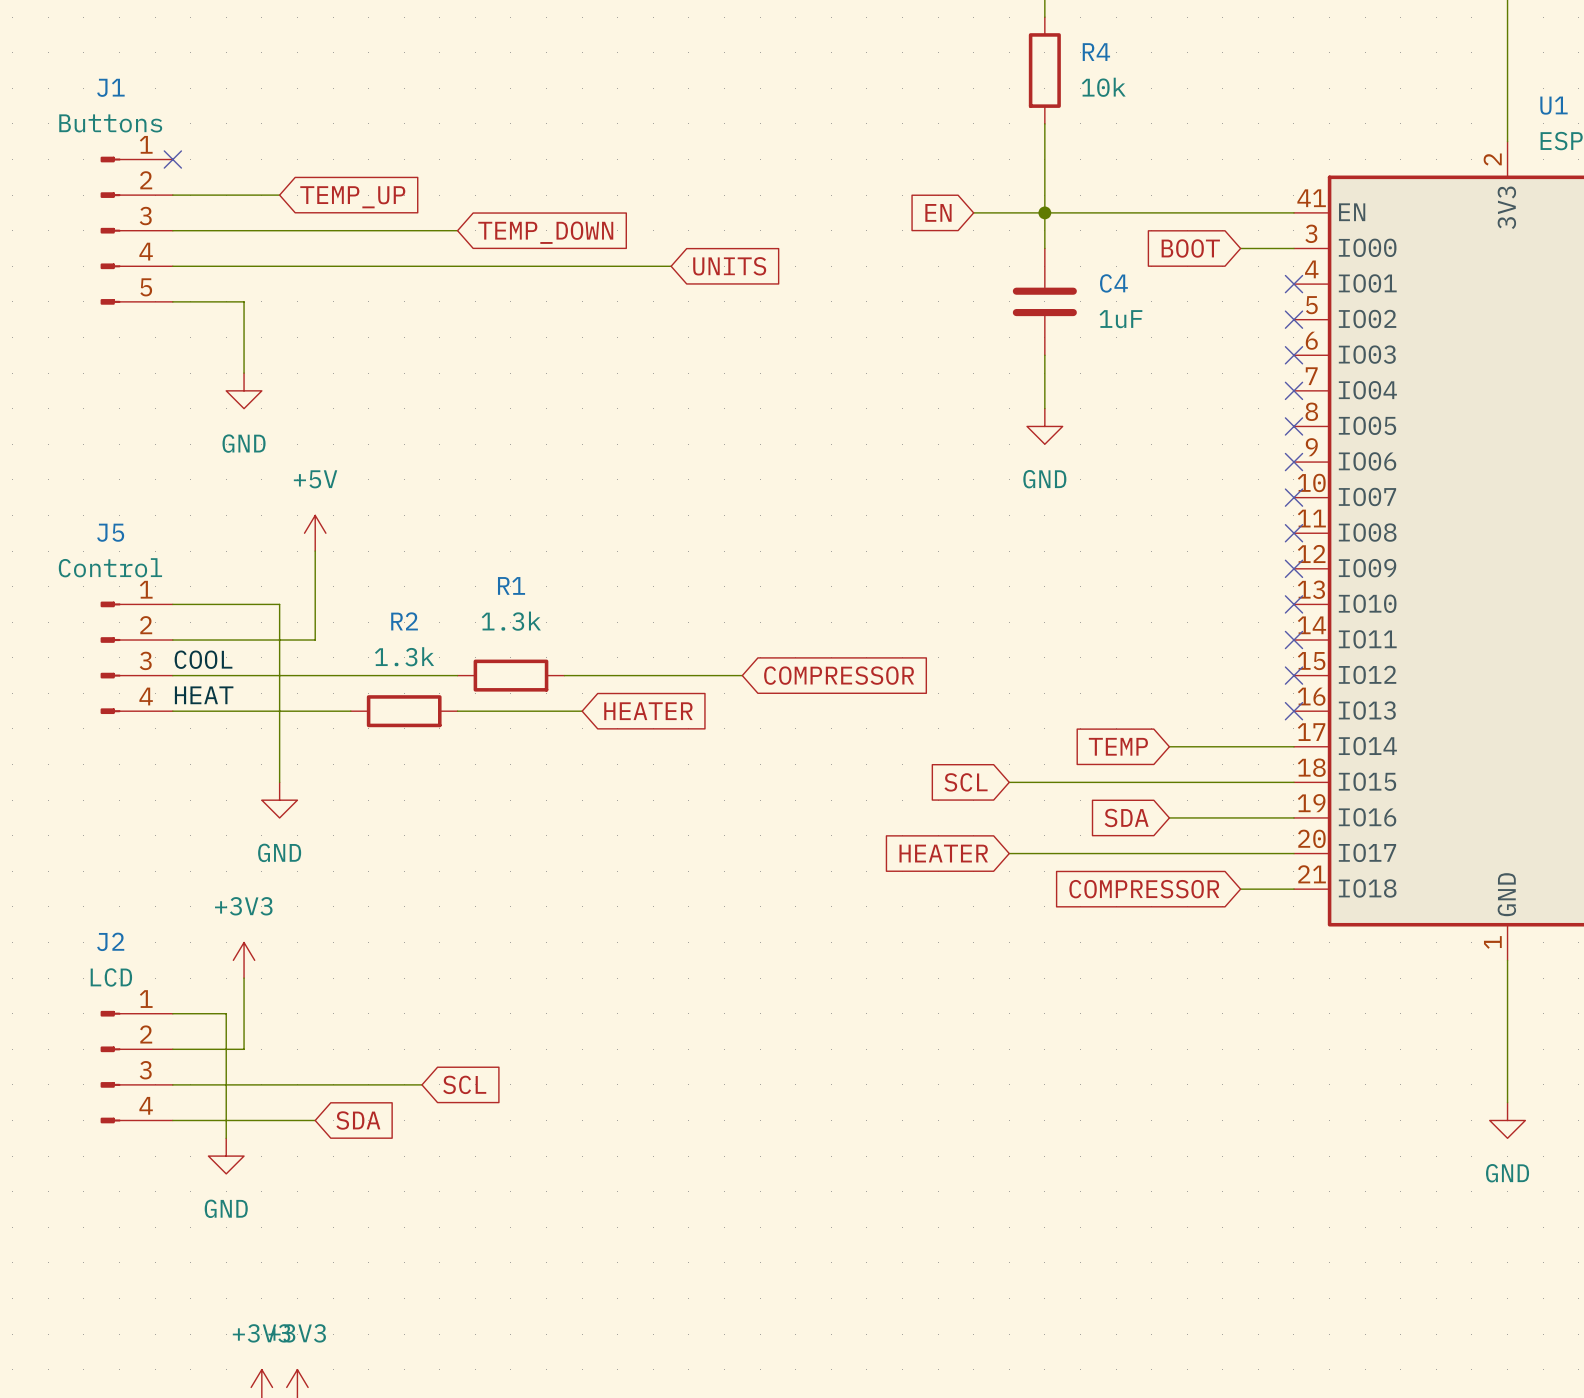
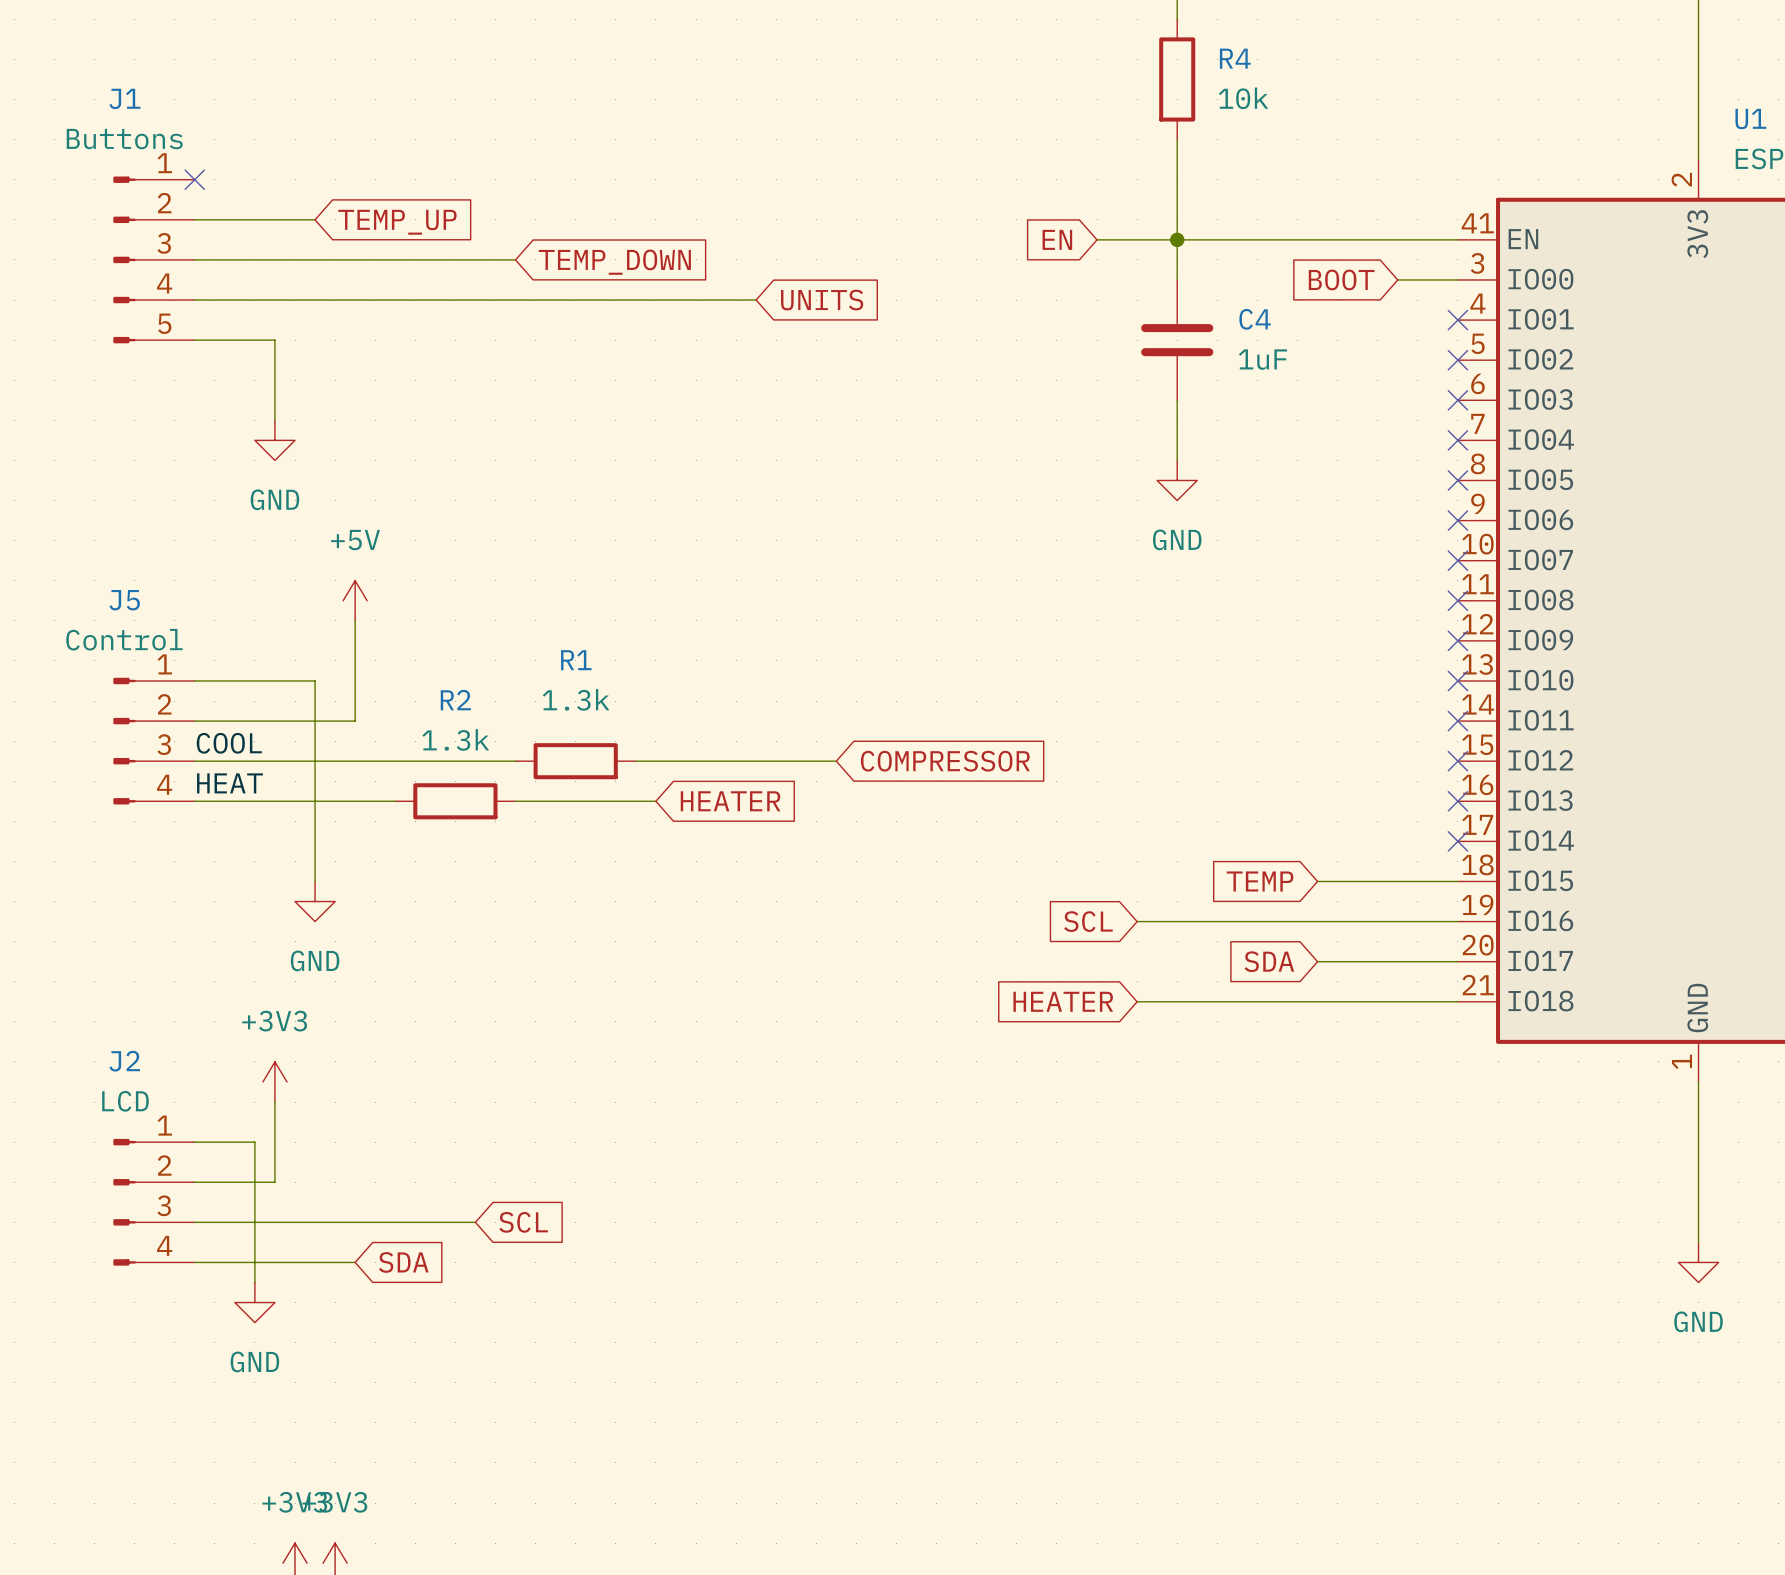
global label position: TEMP (1118, 746) -> TEMP (1260, 881)
wire: (1169, 746) (1293, 746) -> none
no-connect mark: none -> (1457, 841)
global label position: SCL (966, 782) -> SCL (1088, 921)
wire: (1009, 782) (1169, 782) -> (1137, 921) (1317, 921)
global label position: SDA (1126, 817) -> SDA (1269, 961)
global label position: HEATER (943, 853) -> HEATER (1063, 1001)
wire: (1009, 853) (1169, 853) -> none
wire: none -> (1137, 1001) (1397, 1001)
global label: COMPRESSOR (1144, 889) -> none

